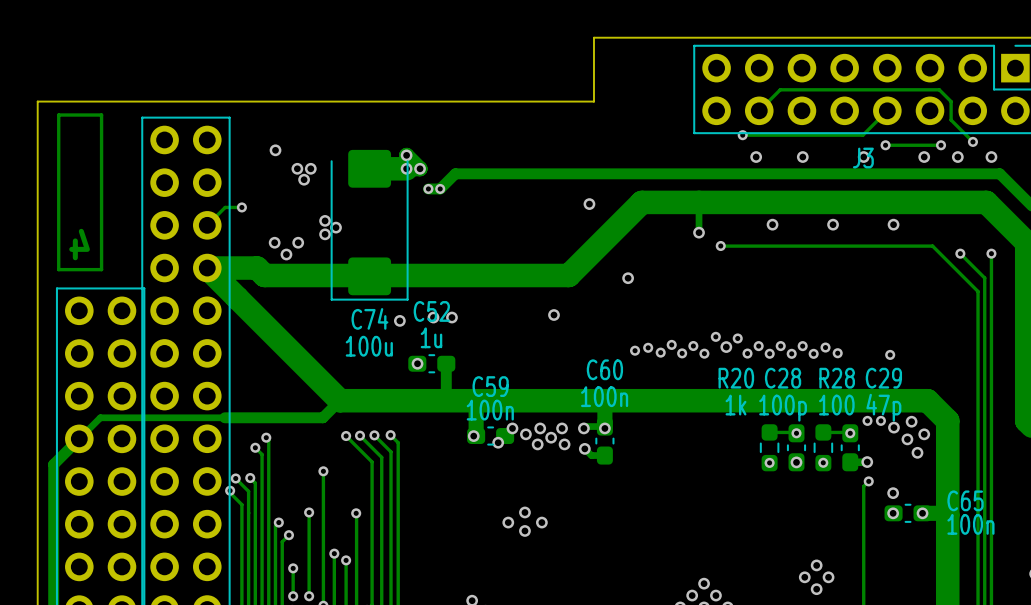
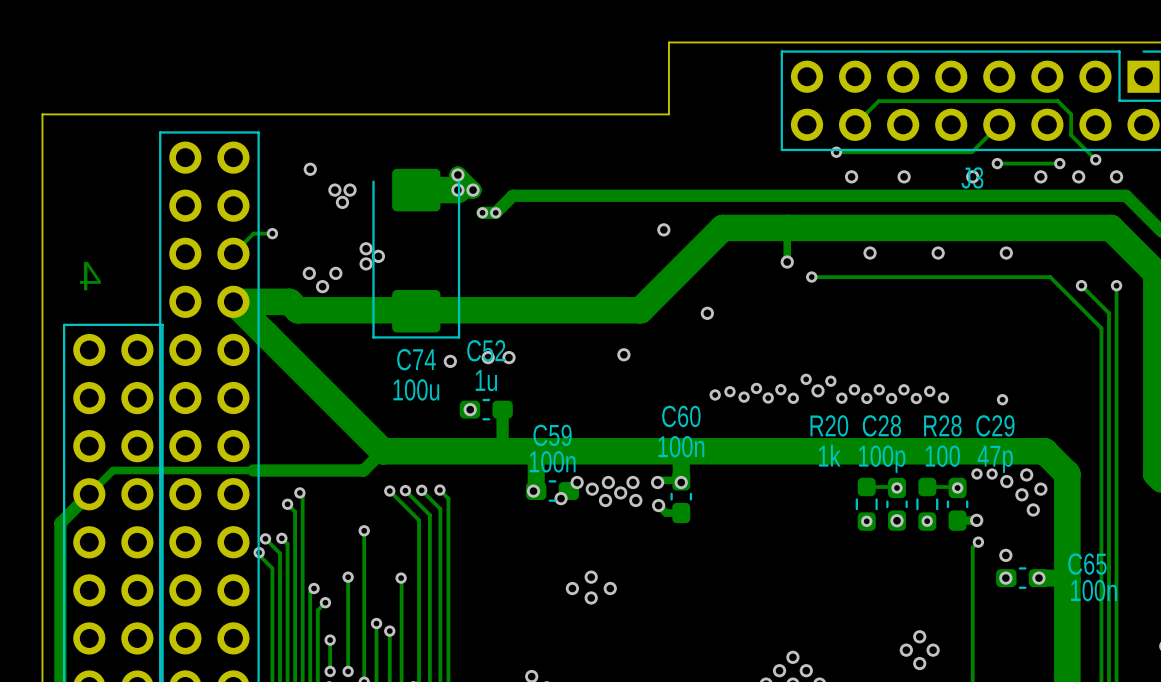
track: (101, 115) (58, 115) (58, 269) (101, 269) (101, 115) -> none

